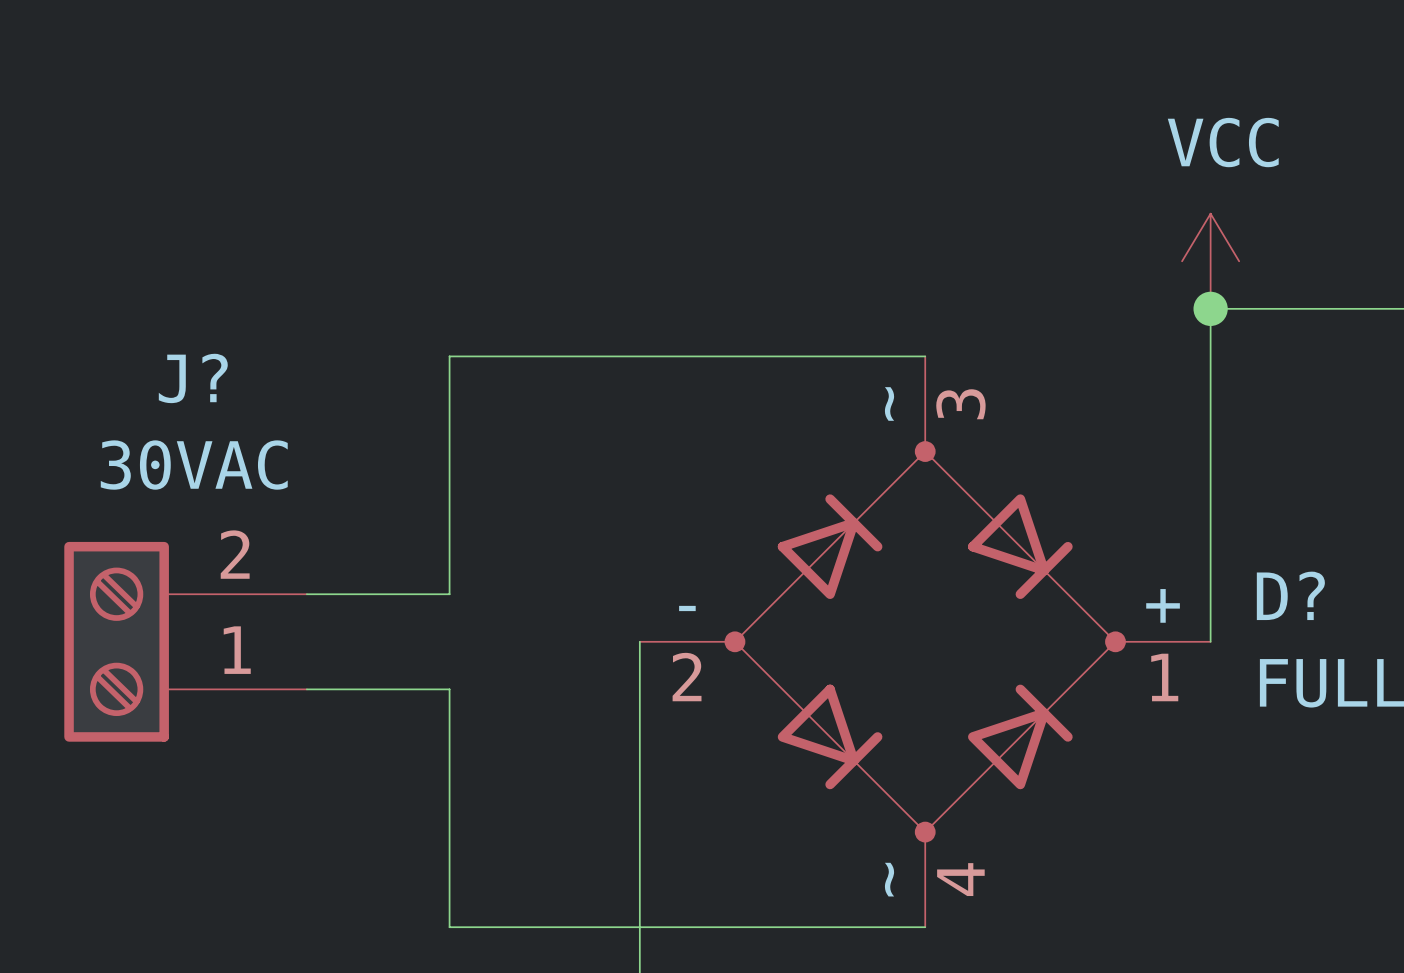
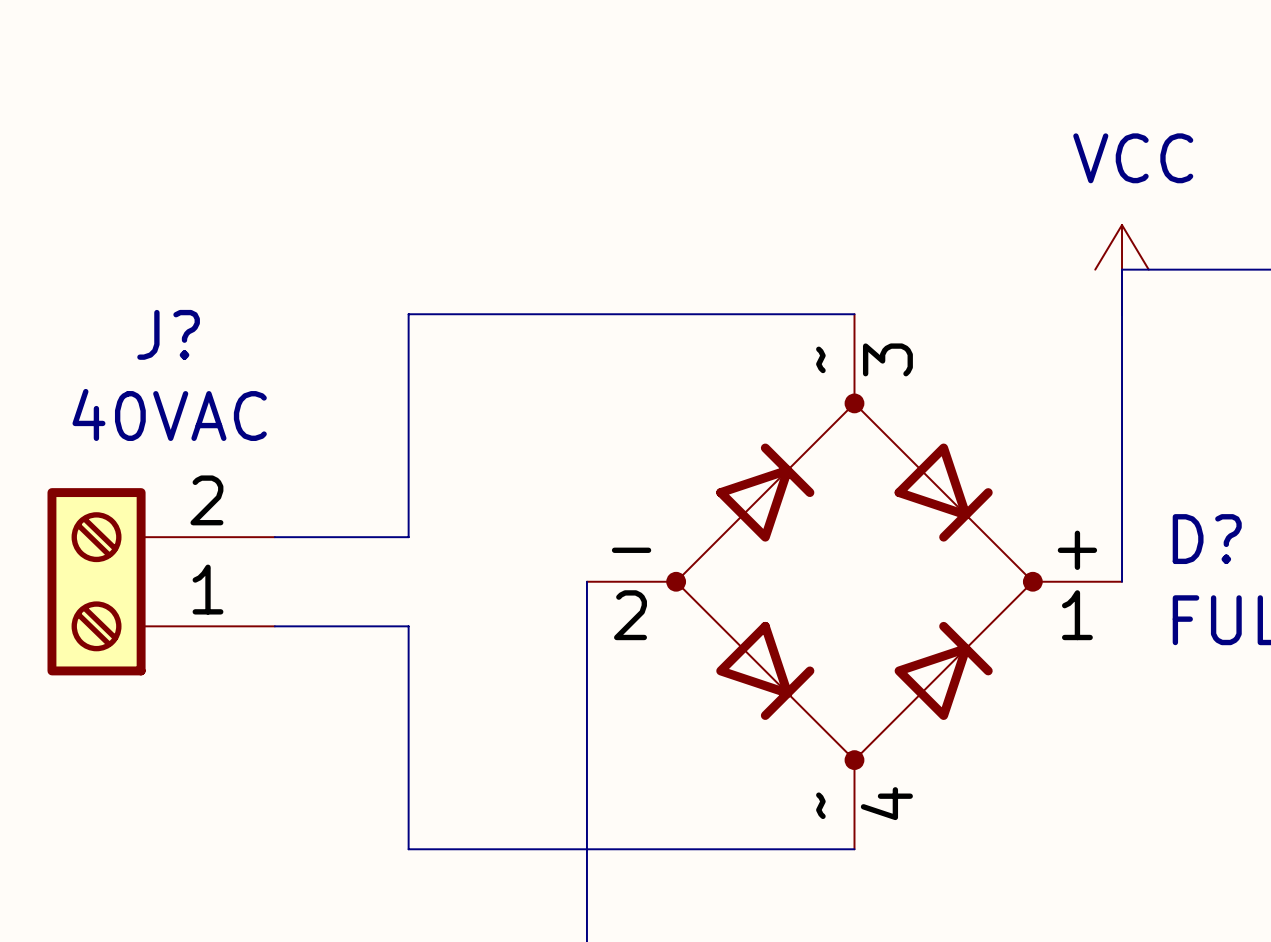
power symbol position: VCC (1210, 261) -> VCC (1122, 269)
junction: (1210, 308) -> none
J? value: 30VAC (194, 465) -> 40VAC (169, 414)

